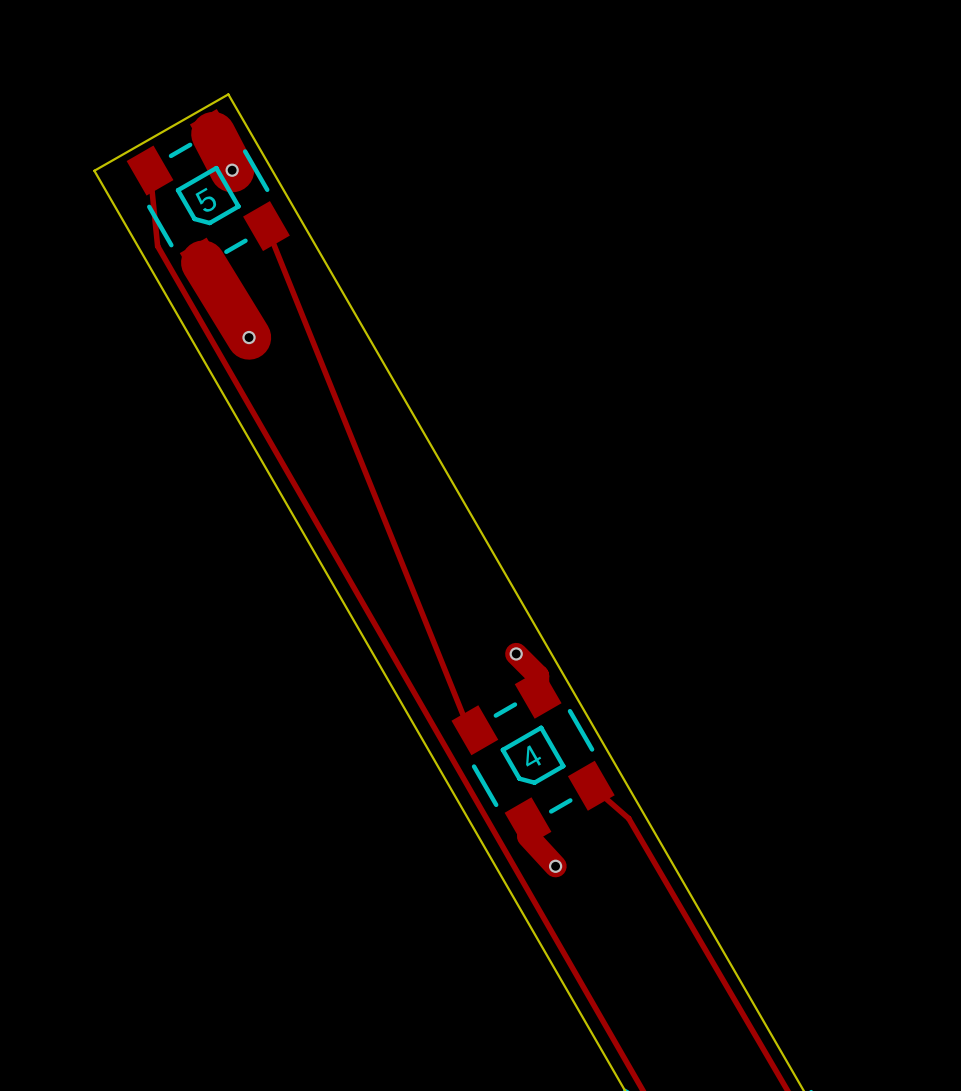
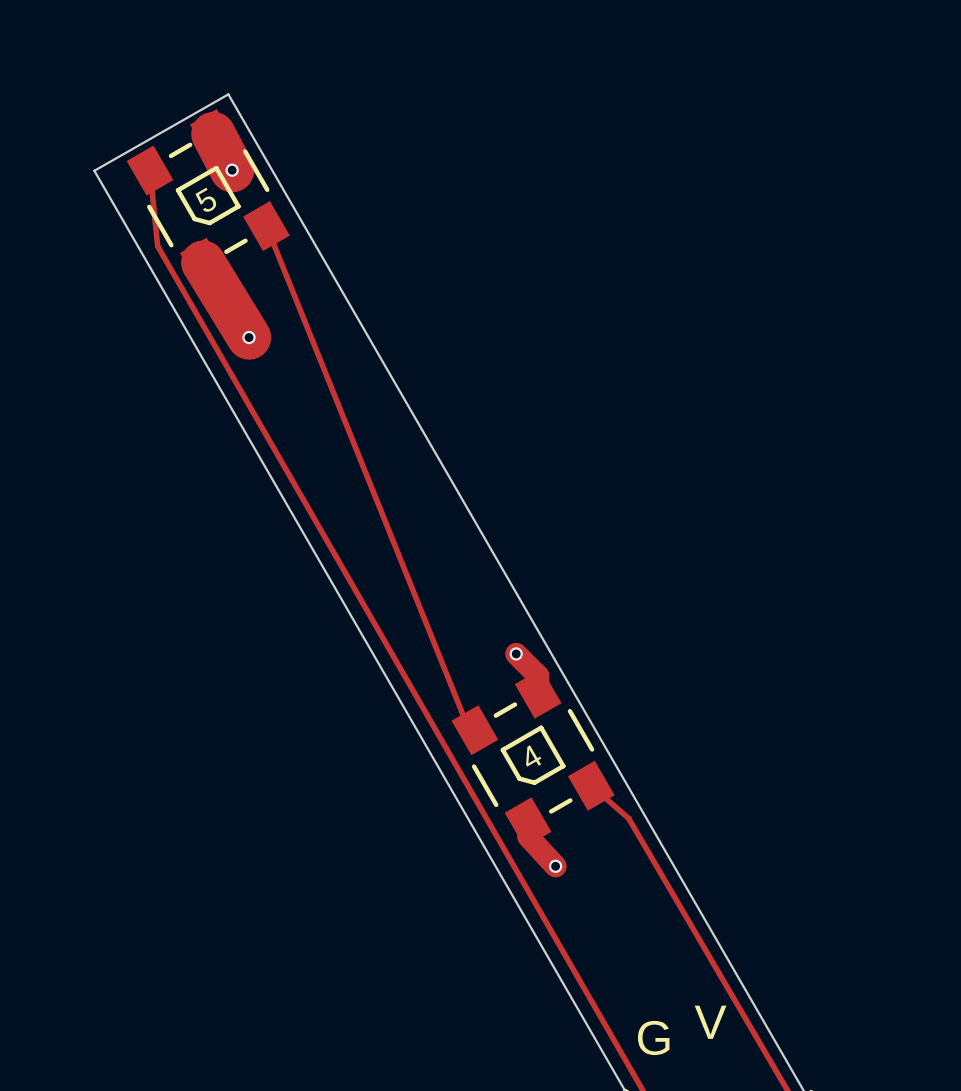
text: none -> V (710, 1022)
text: none -> G (653, 1038)

